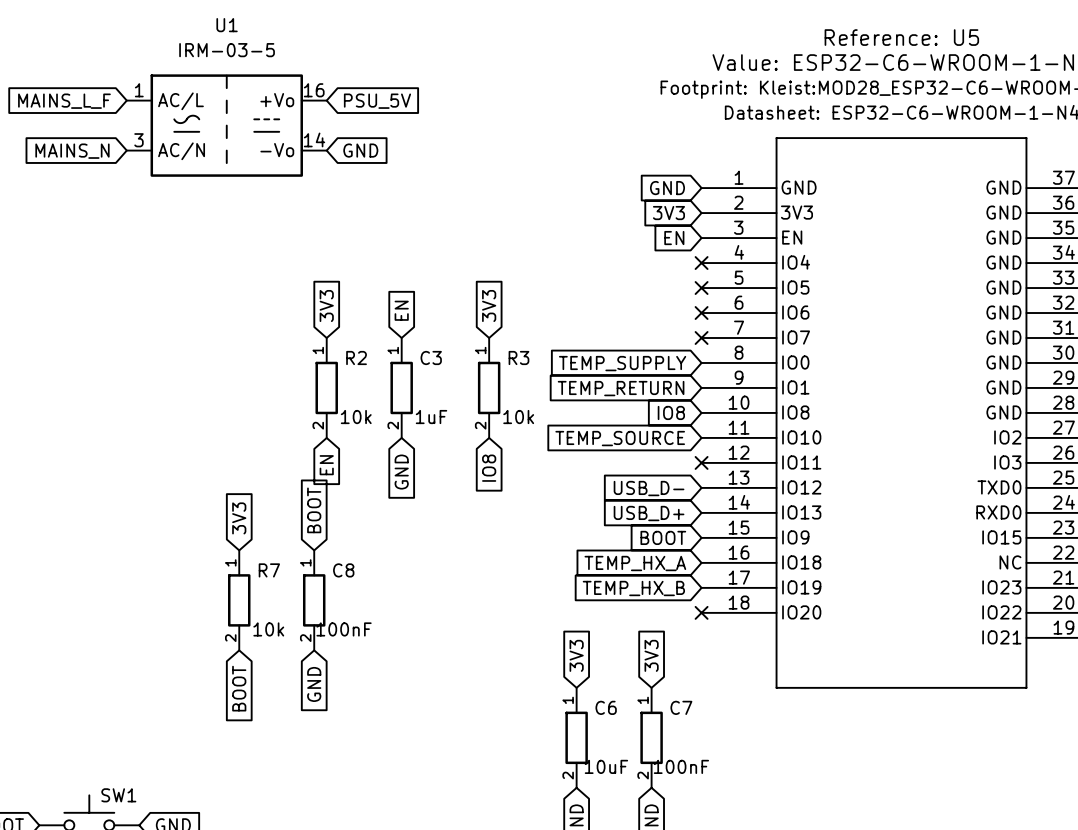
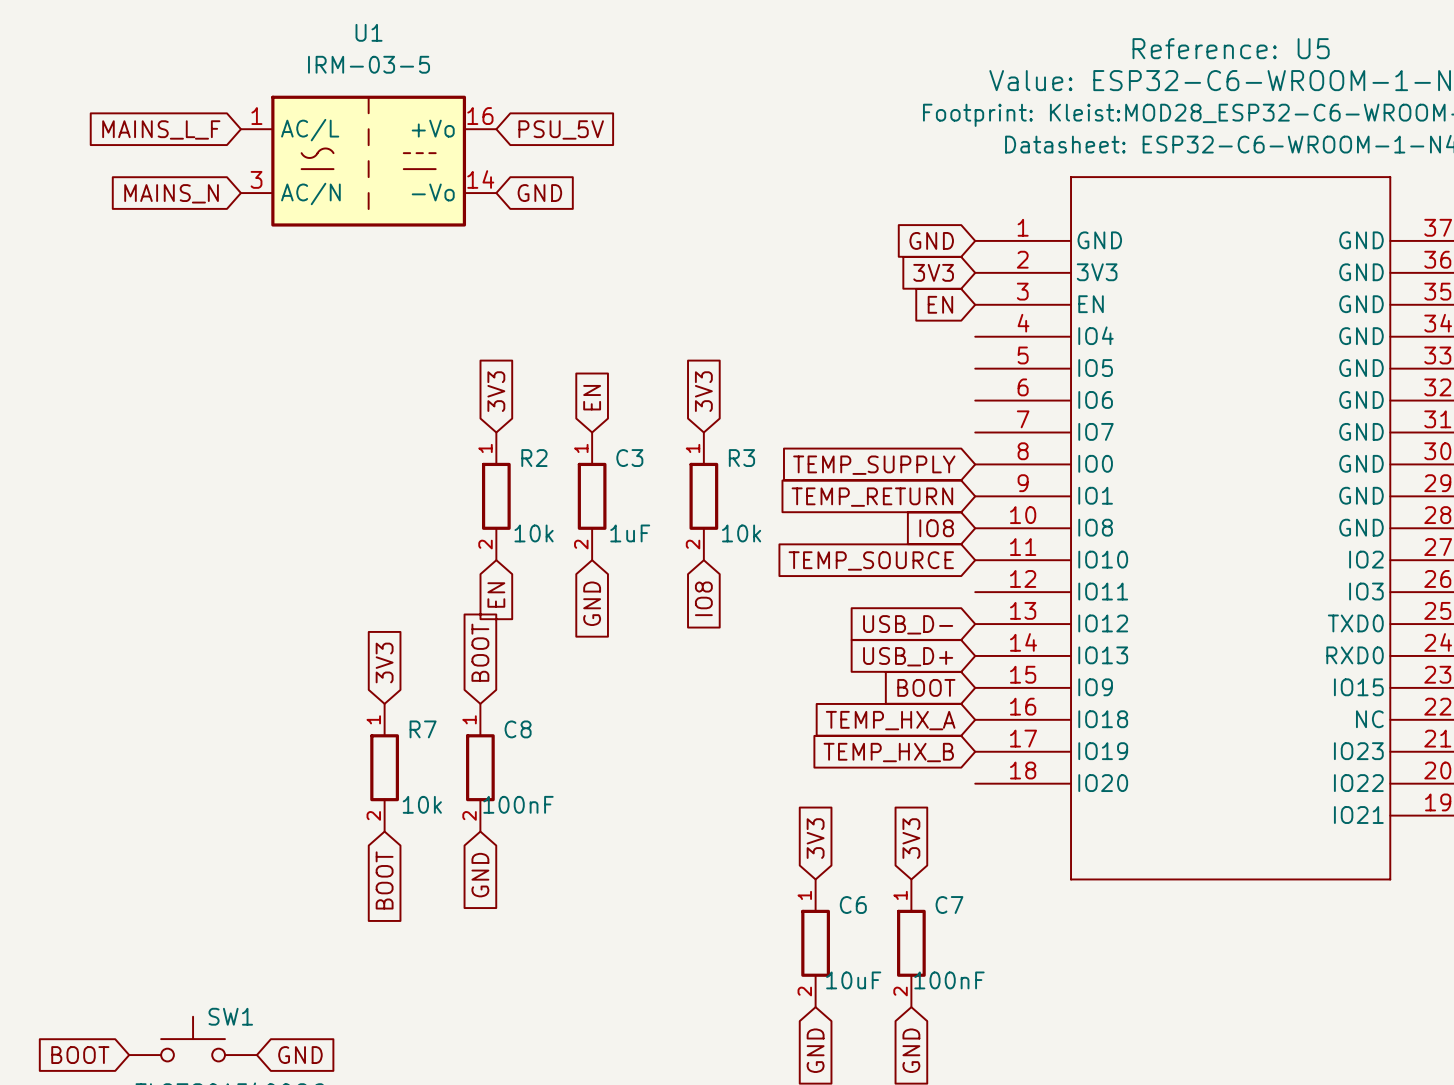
no-connect mark: (701, 263) -> none
no-connect mark: (701, 288) -> none
no-connect mark: (701, 313) -> none
no-connect mark: (701, 337) -> none
no-connect mark: (701, 462) -> none
no-connect mark: (701, 612) -> none

